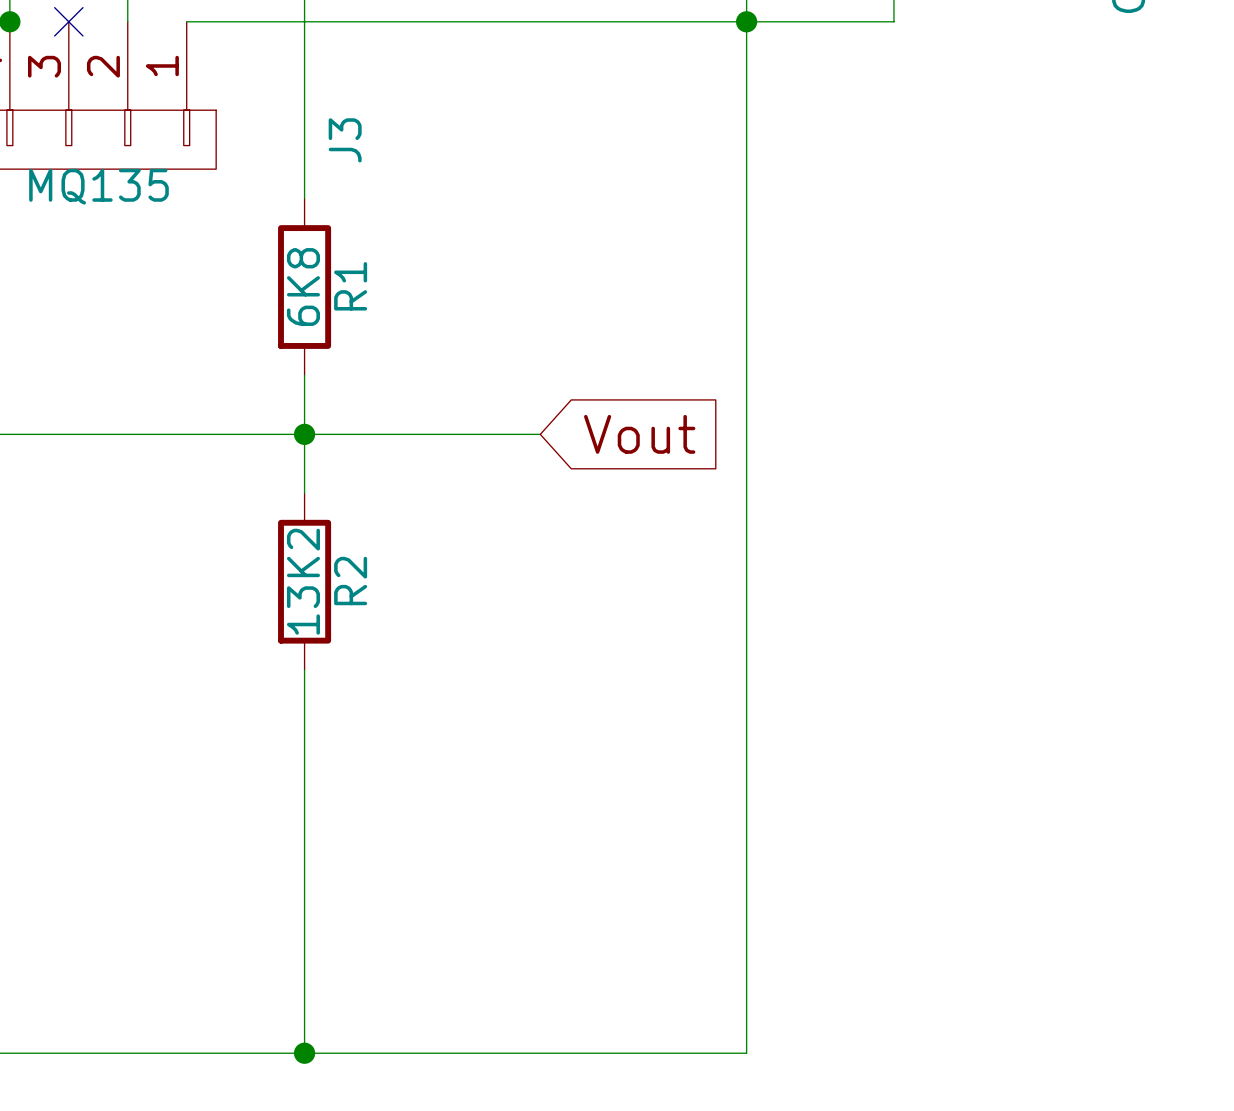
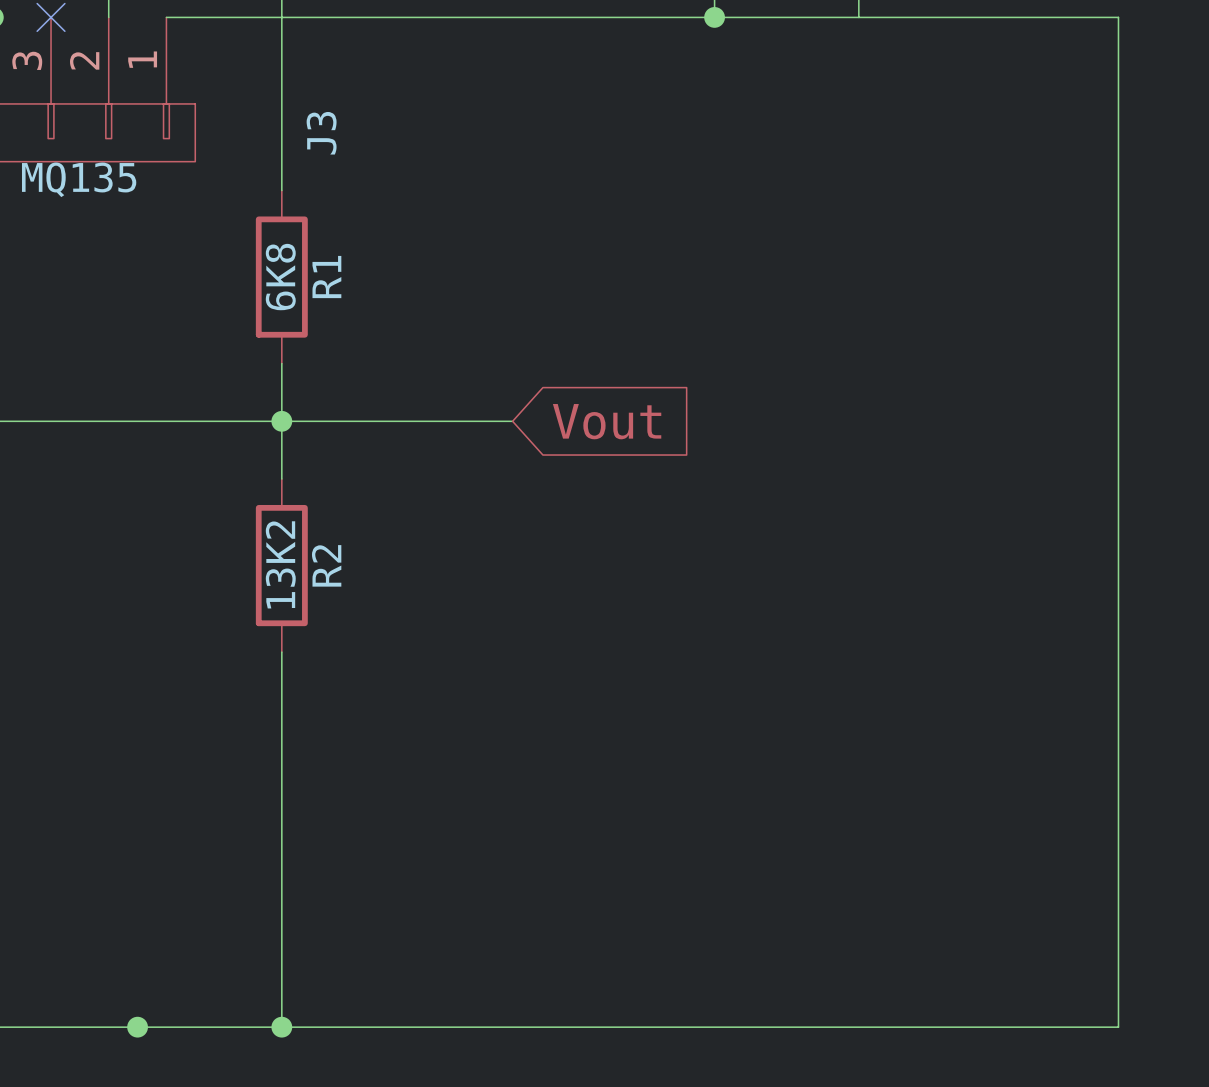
wire: (746, 21) (746, 1053) -> (858, 17) (1118, 17) (1118, 1027) (714, 1027)
junction: none -> (137, 1027)

